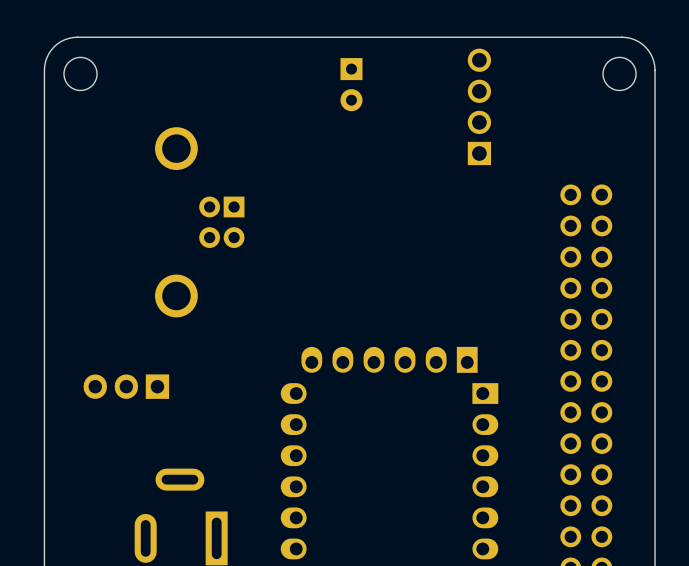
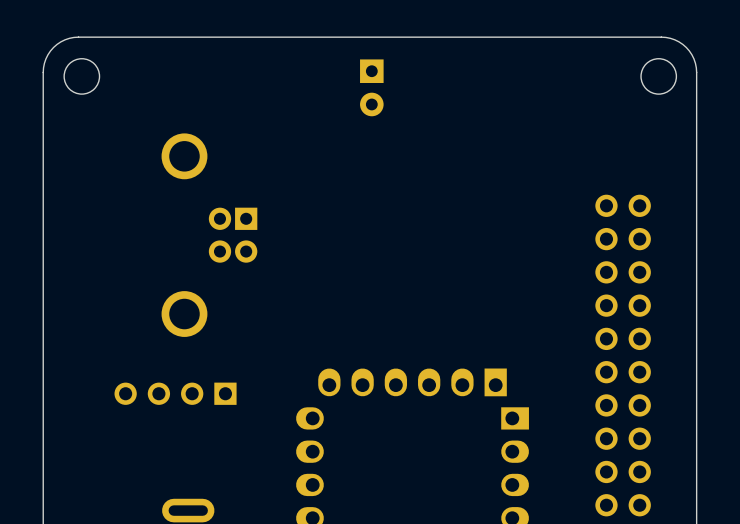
part: (479, 106) -> none
part: none -> (175, 393)
part: (126, 386) -> none

